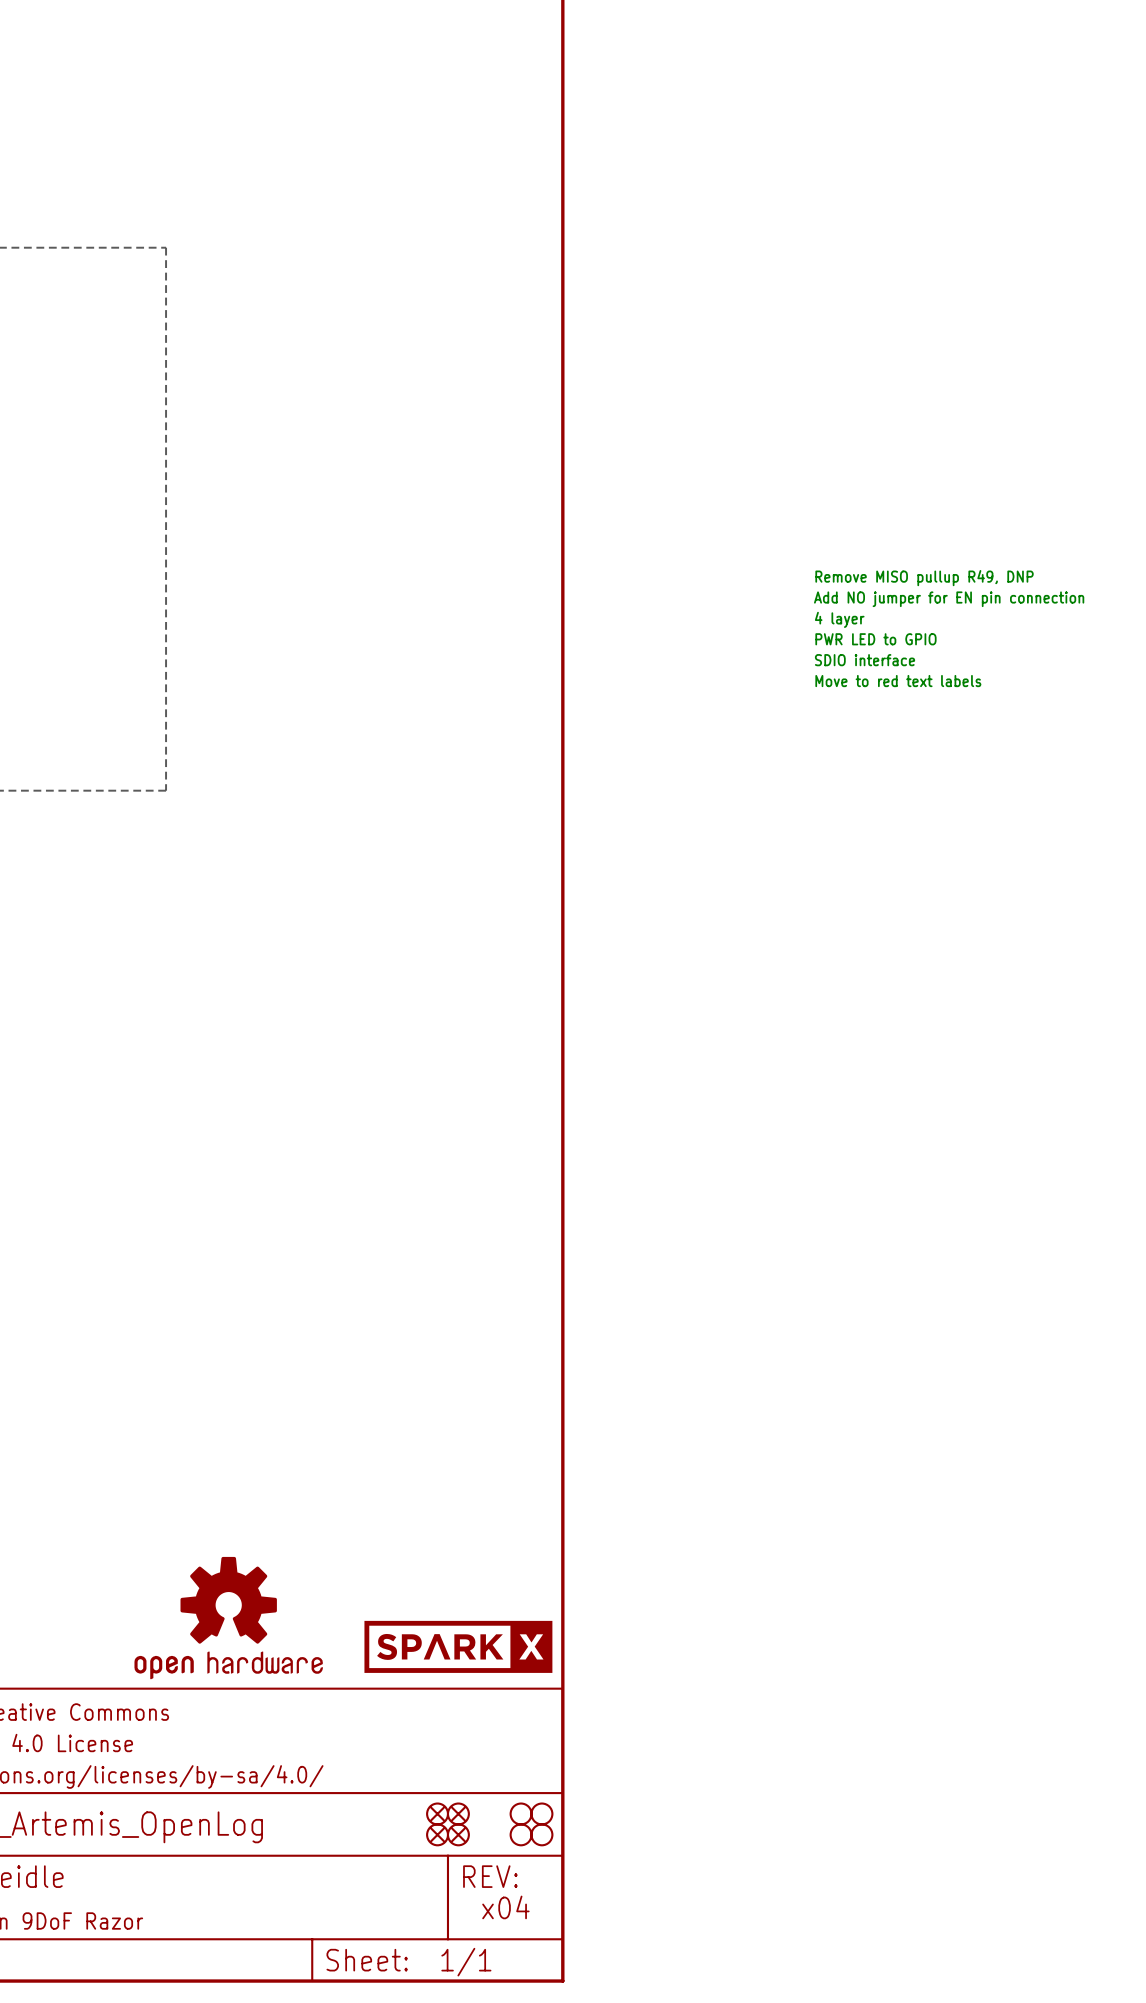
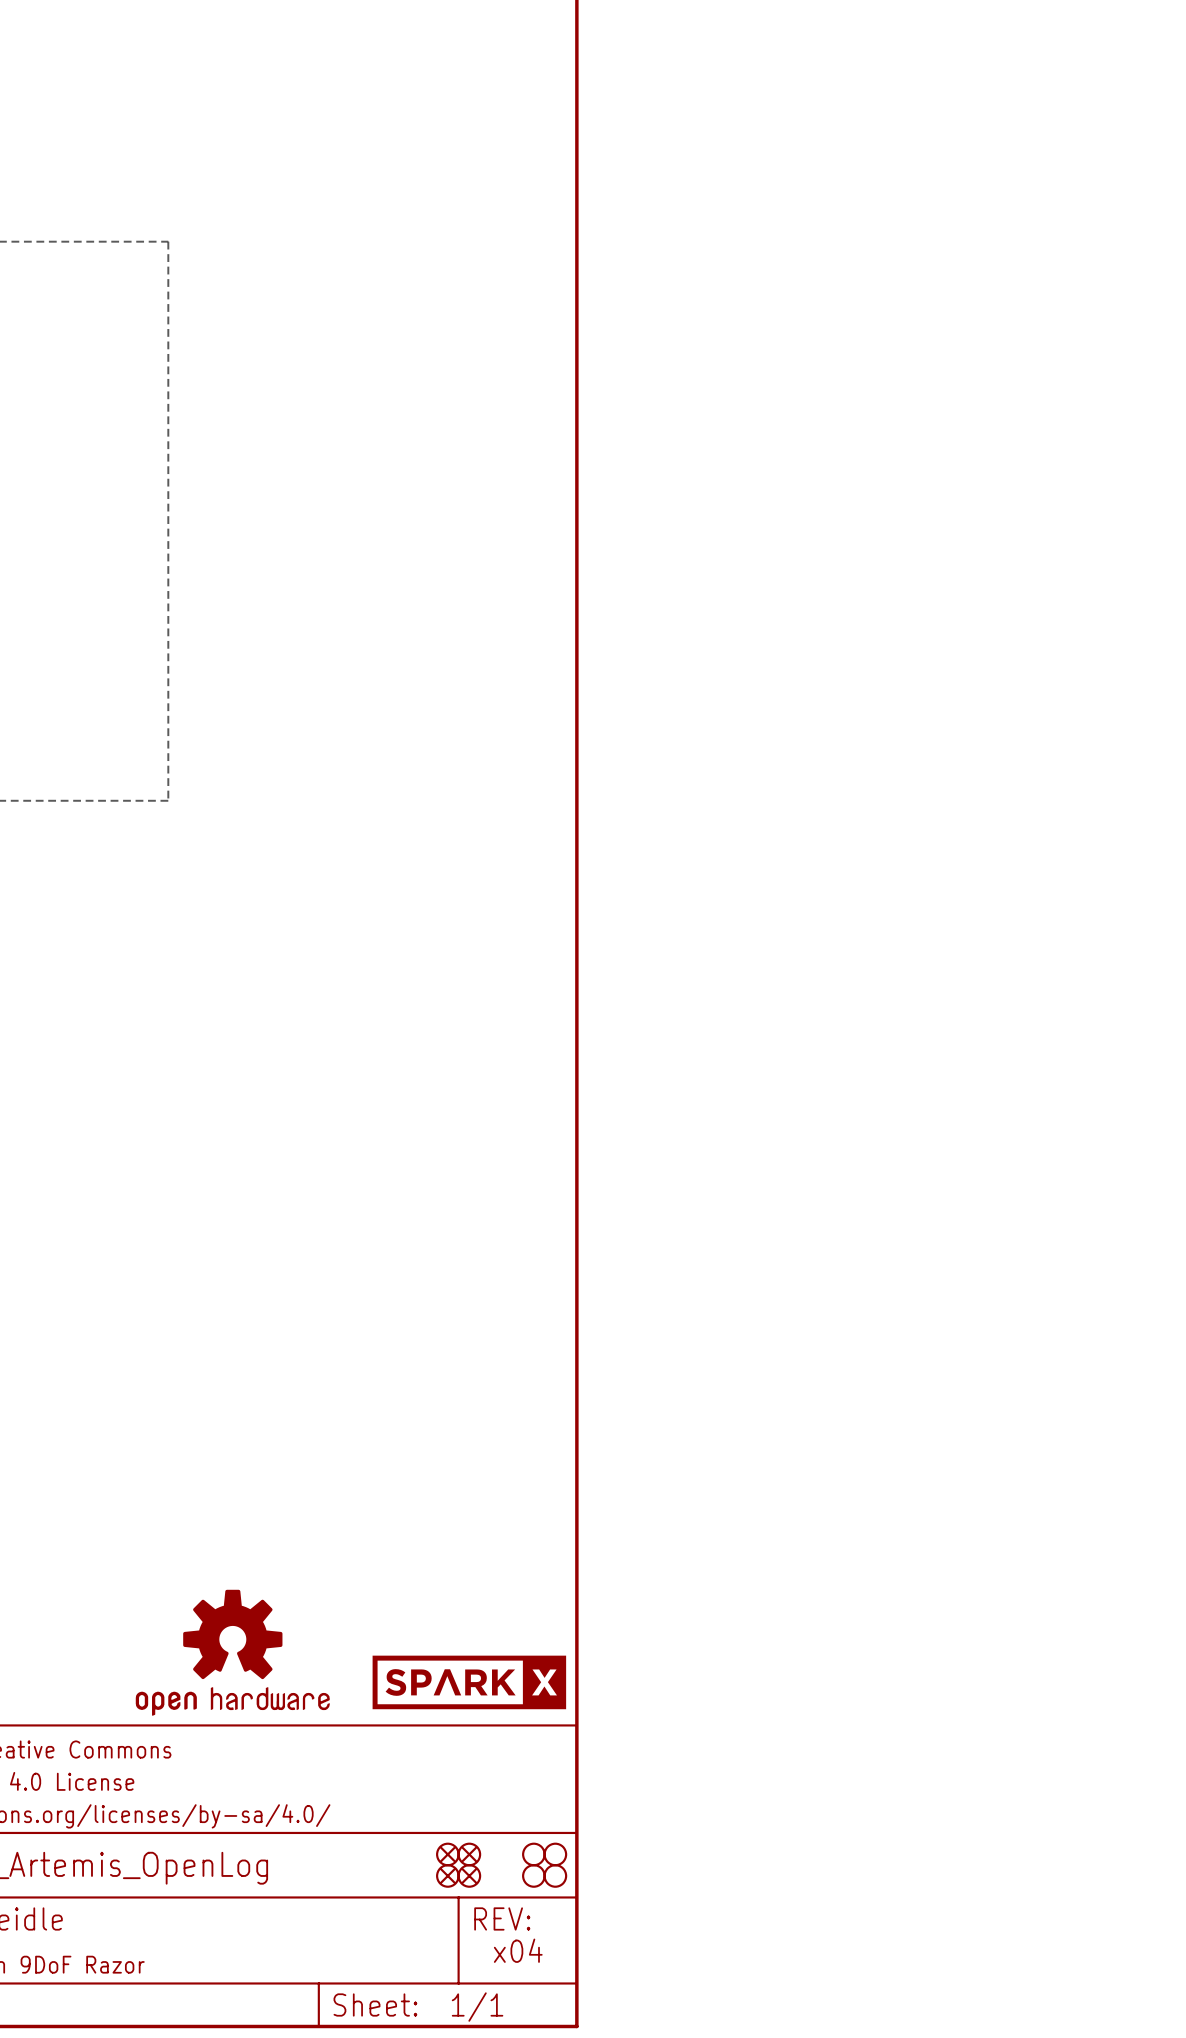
text: Remove MISO pullup R49, DNP (924, 578) -> none
text: Add NO jumper for EN pin connection (949, 599) -> none
text: 4 layer (839, 619) -> none
text: PWR LED to GPIO (875, 639) -> none
text: SDIO interface (865, 660) -> none
text: Move to red text labels (898, 681) -> none

